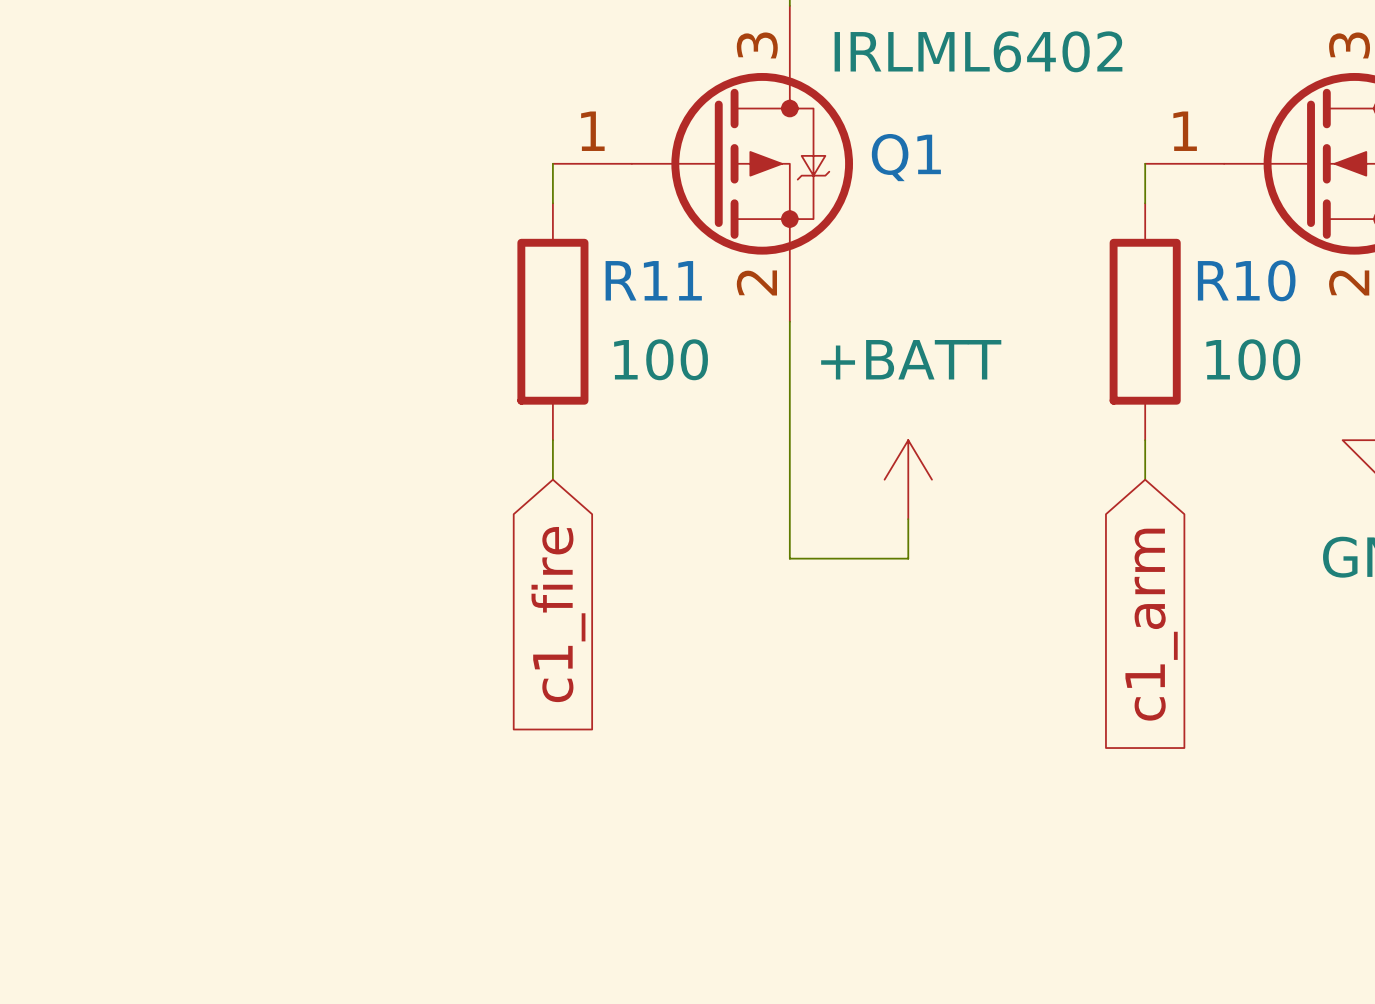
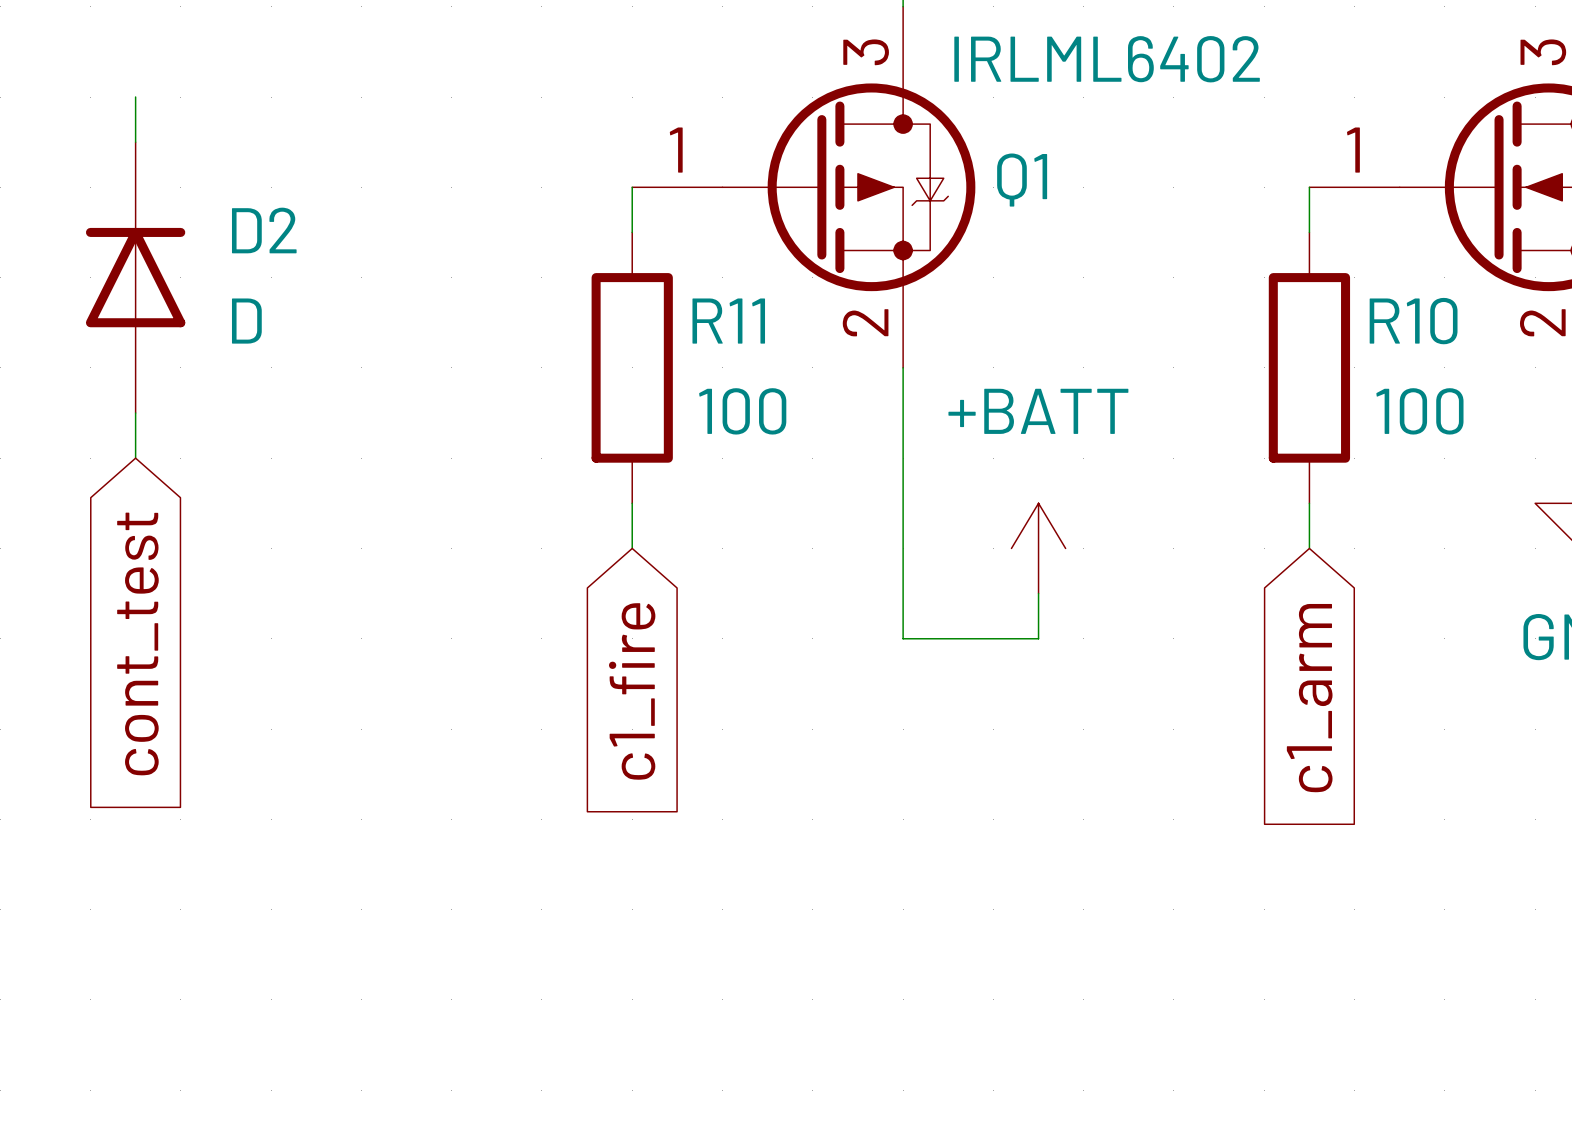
wire: none -> (135, 97) (135, 142)
D2: none -> D (135, 277)
wire: none -> (135, 413) (135, 458)
global label: none -> cont_test (137, 643)

